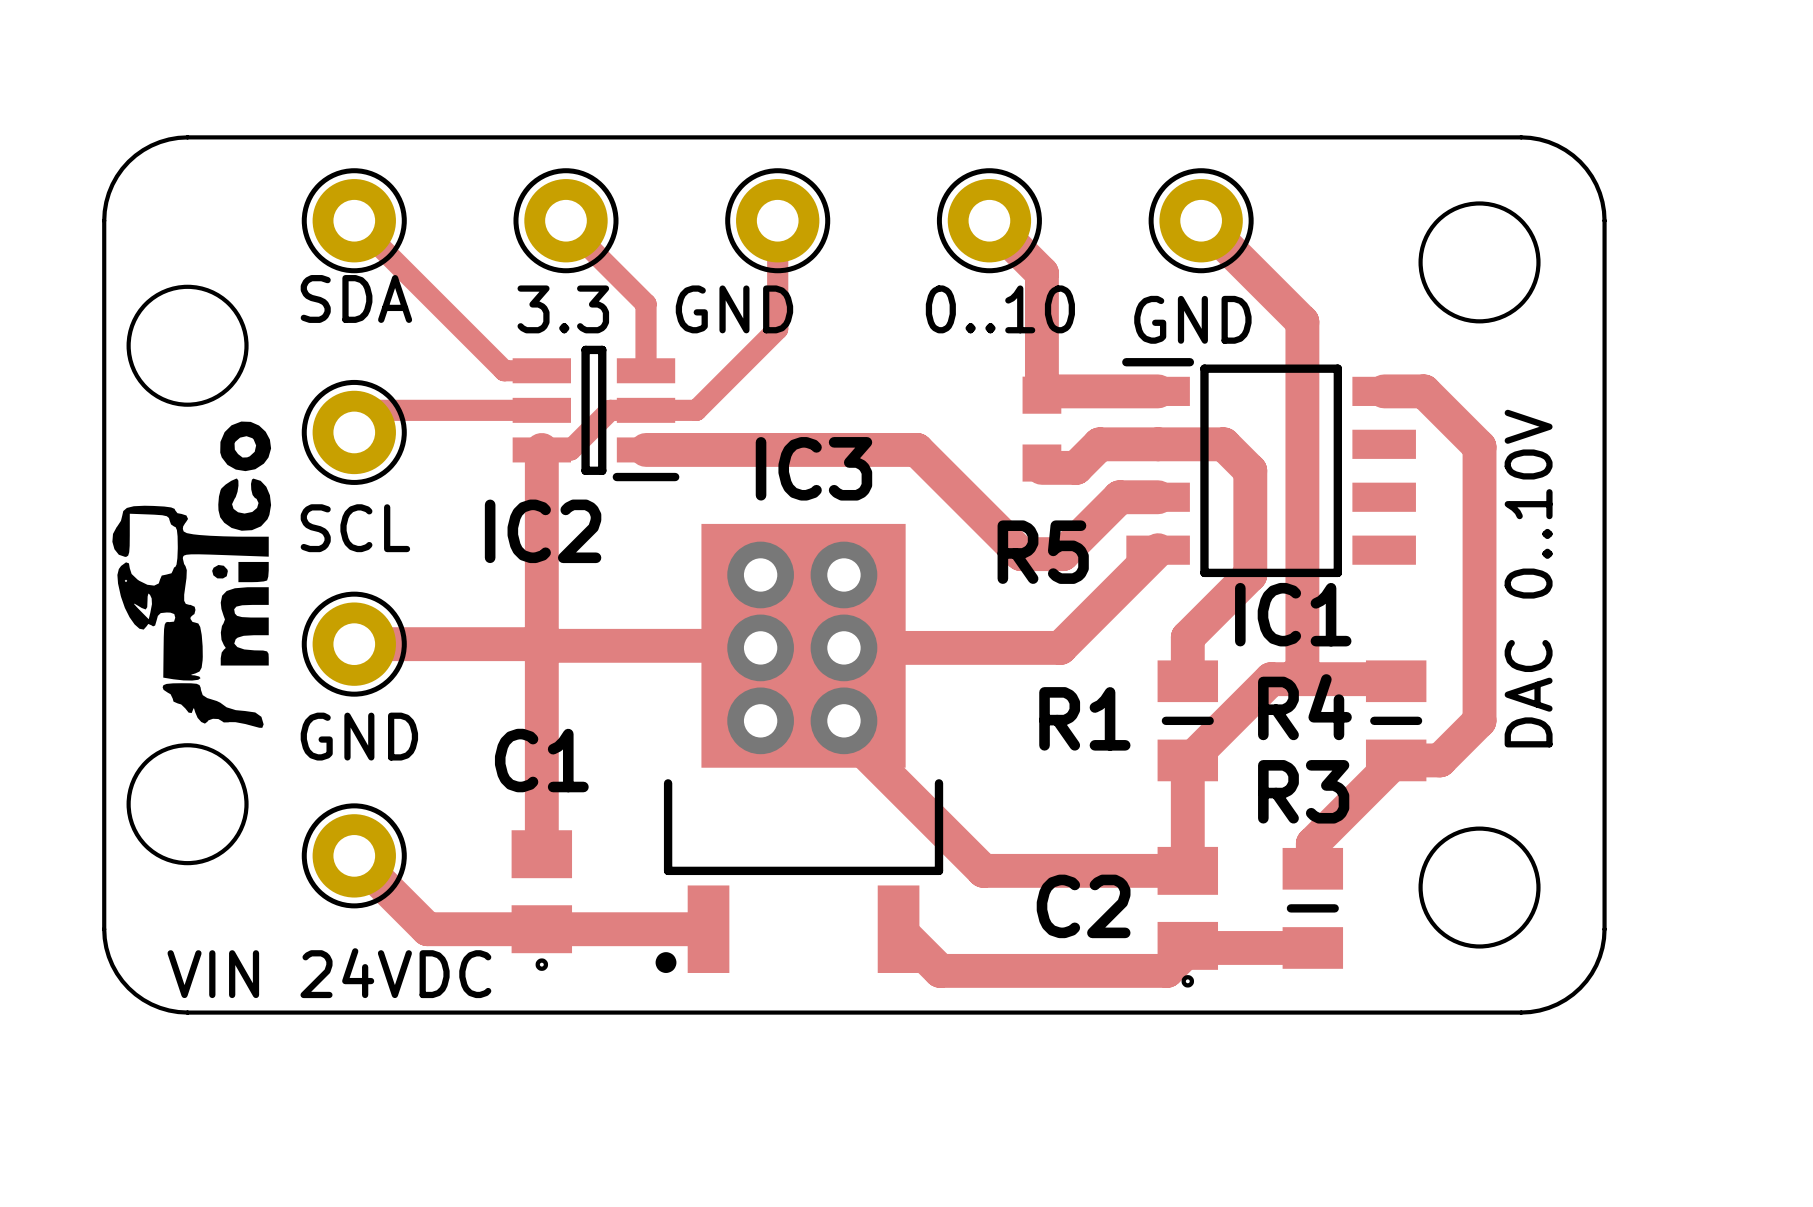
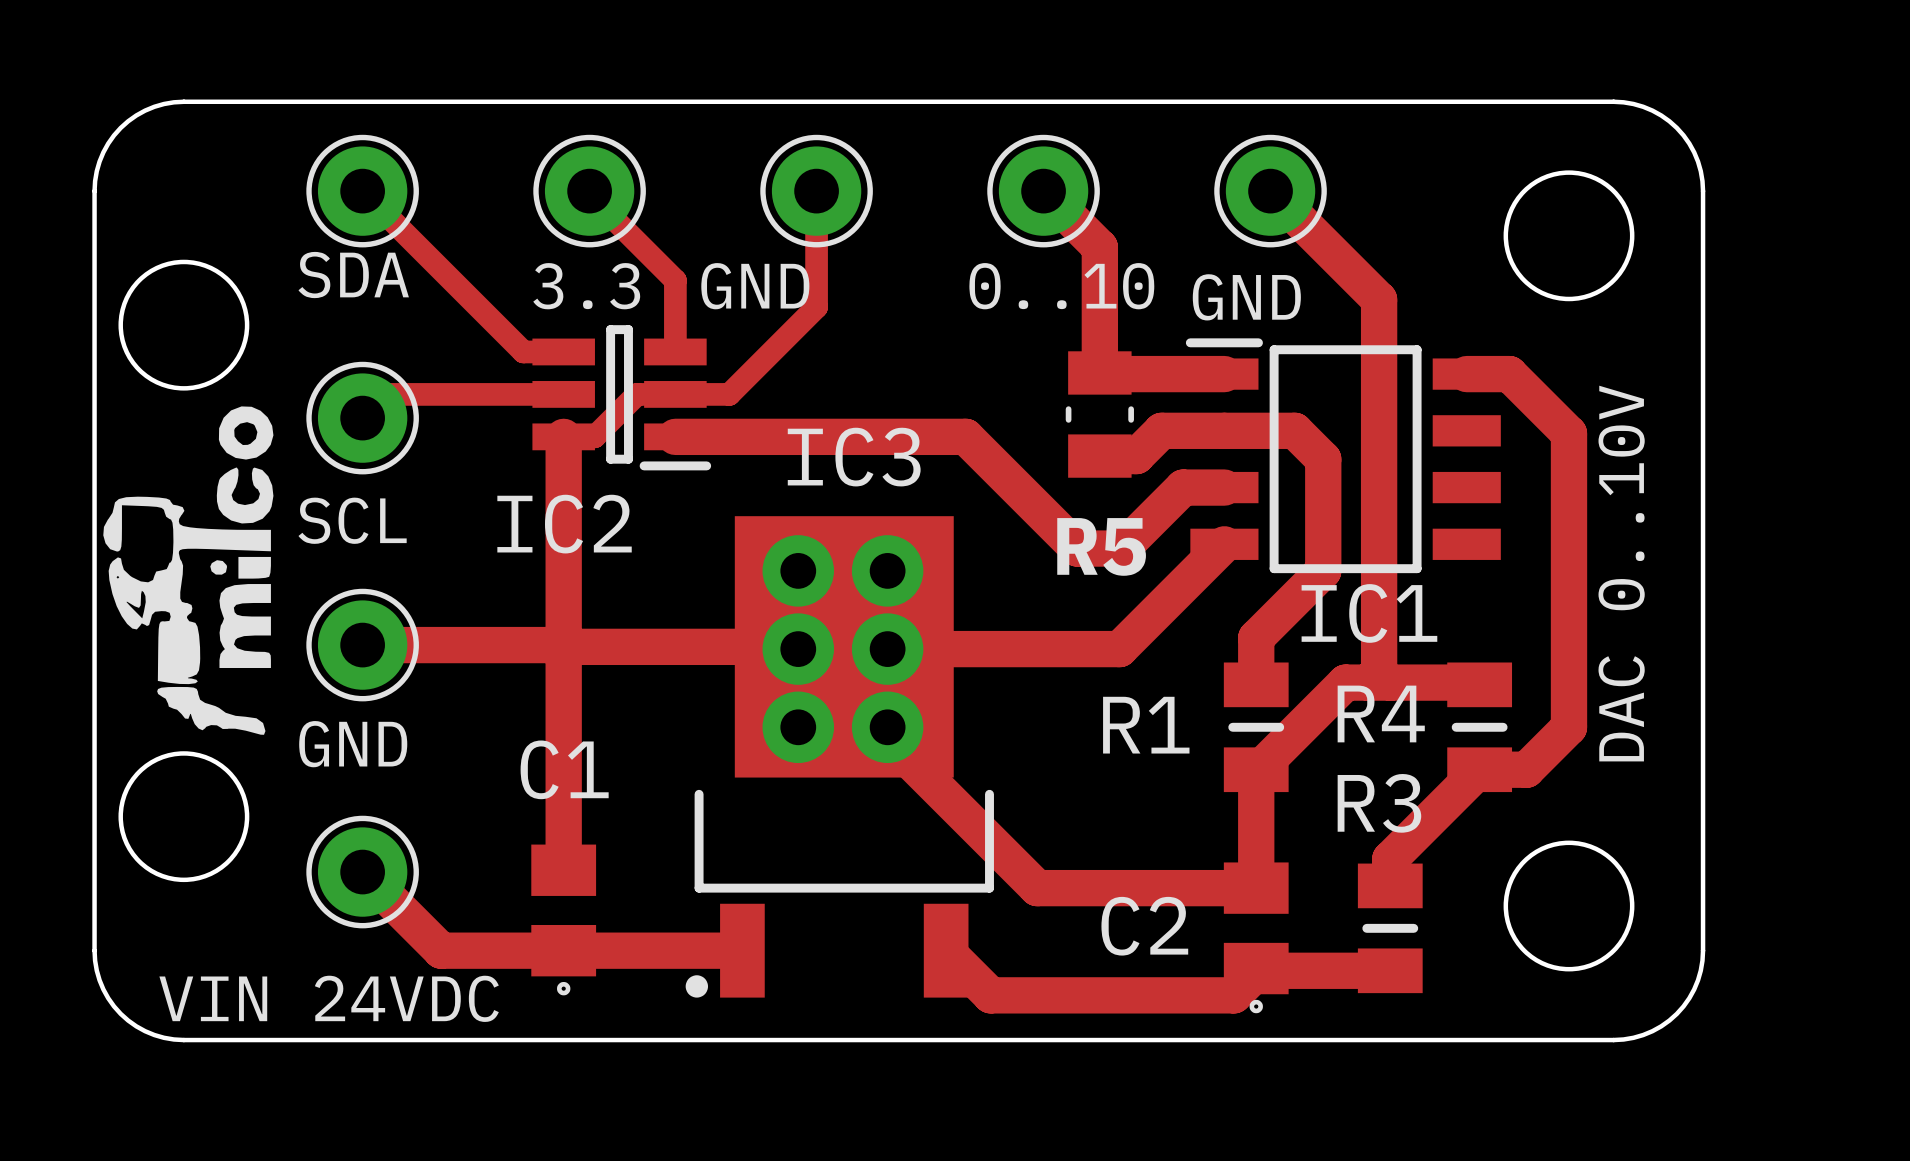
R5 footprint: [1022, 376, 1062, 482] -> [1065, 351, 1134, 478]

